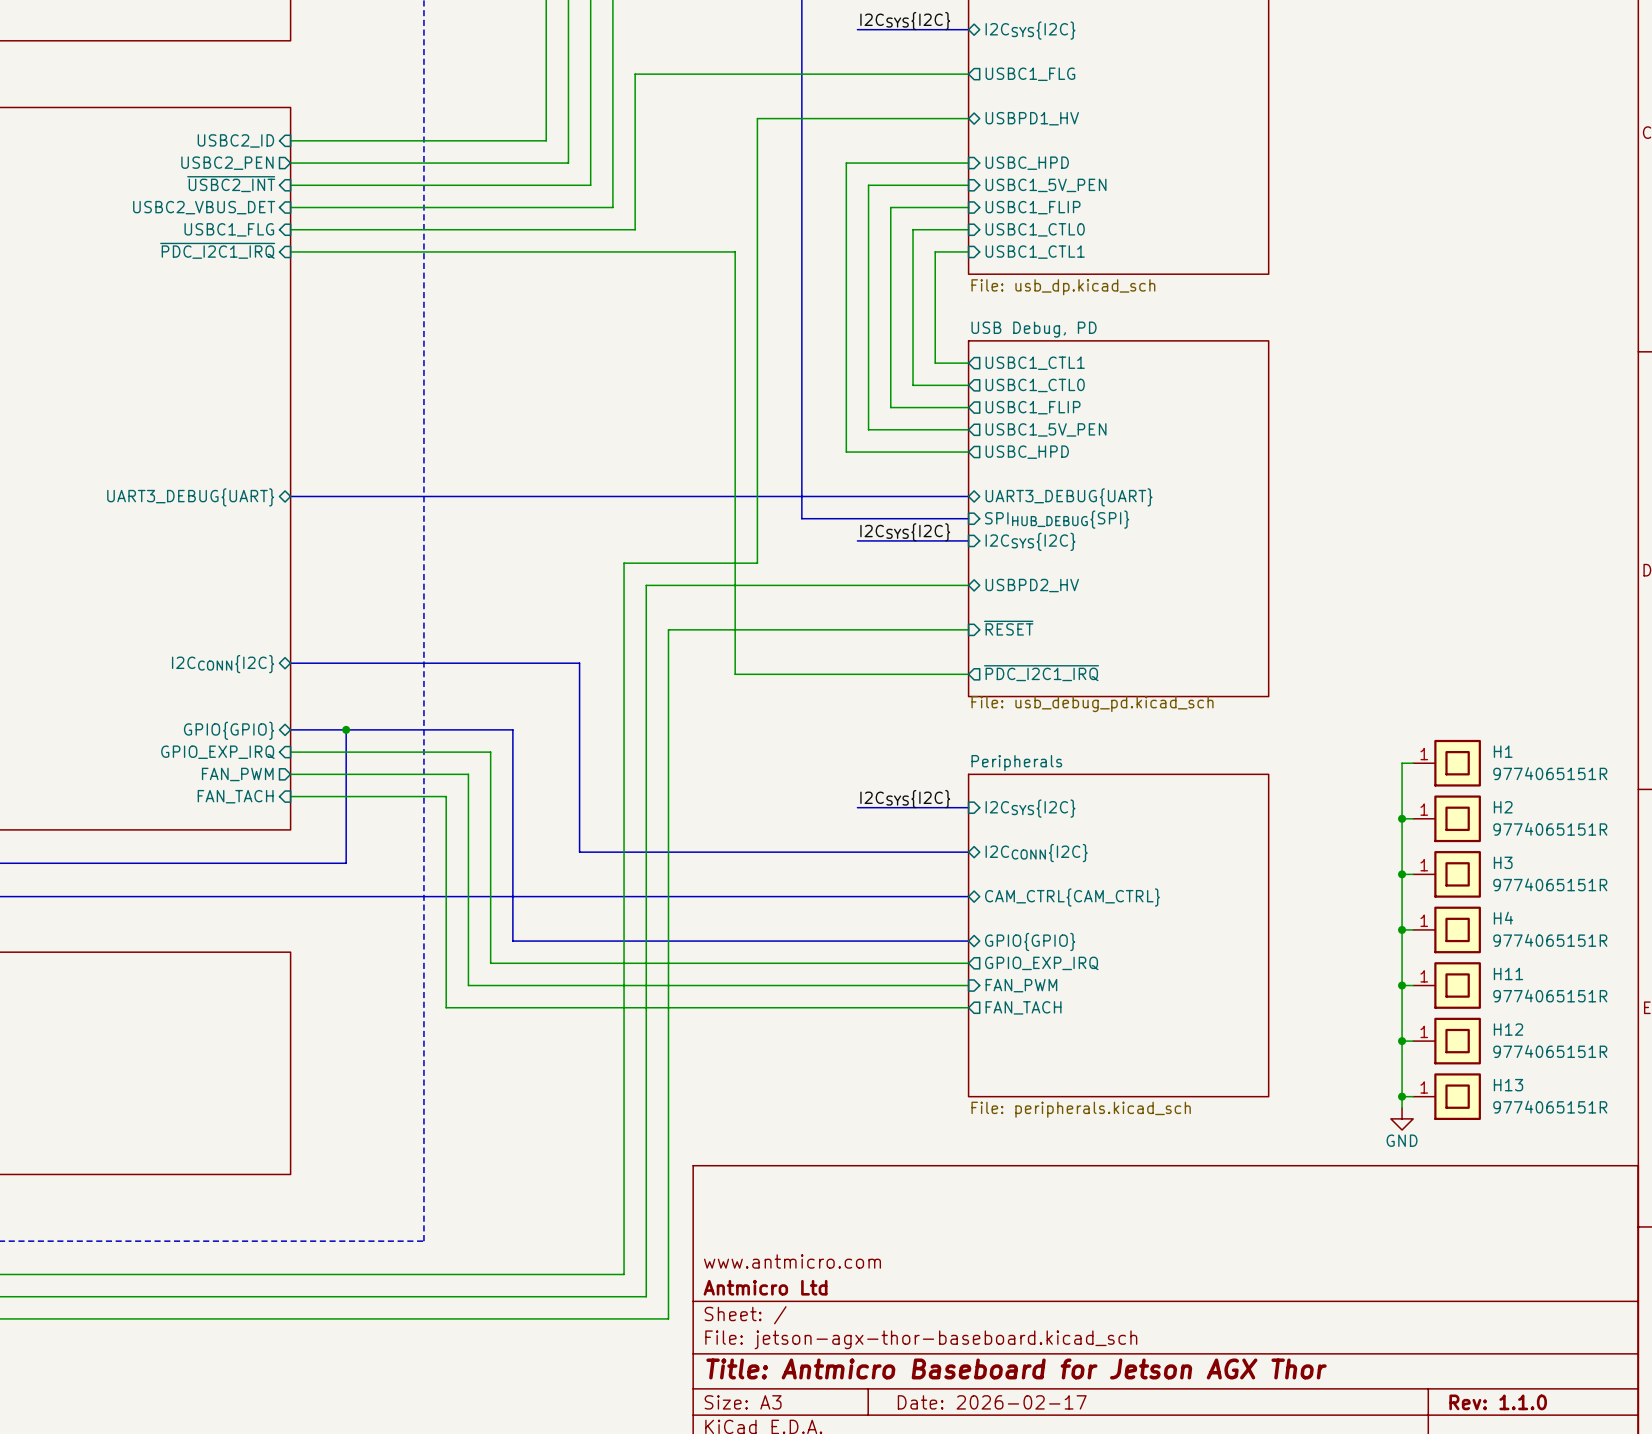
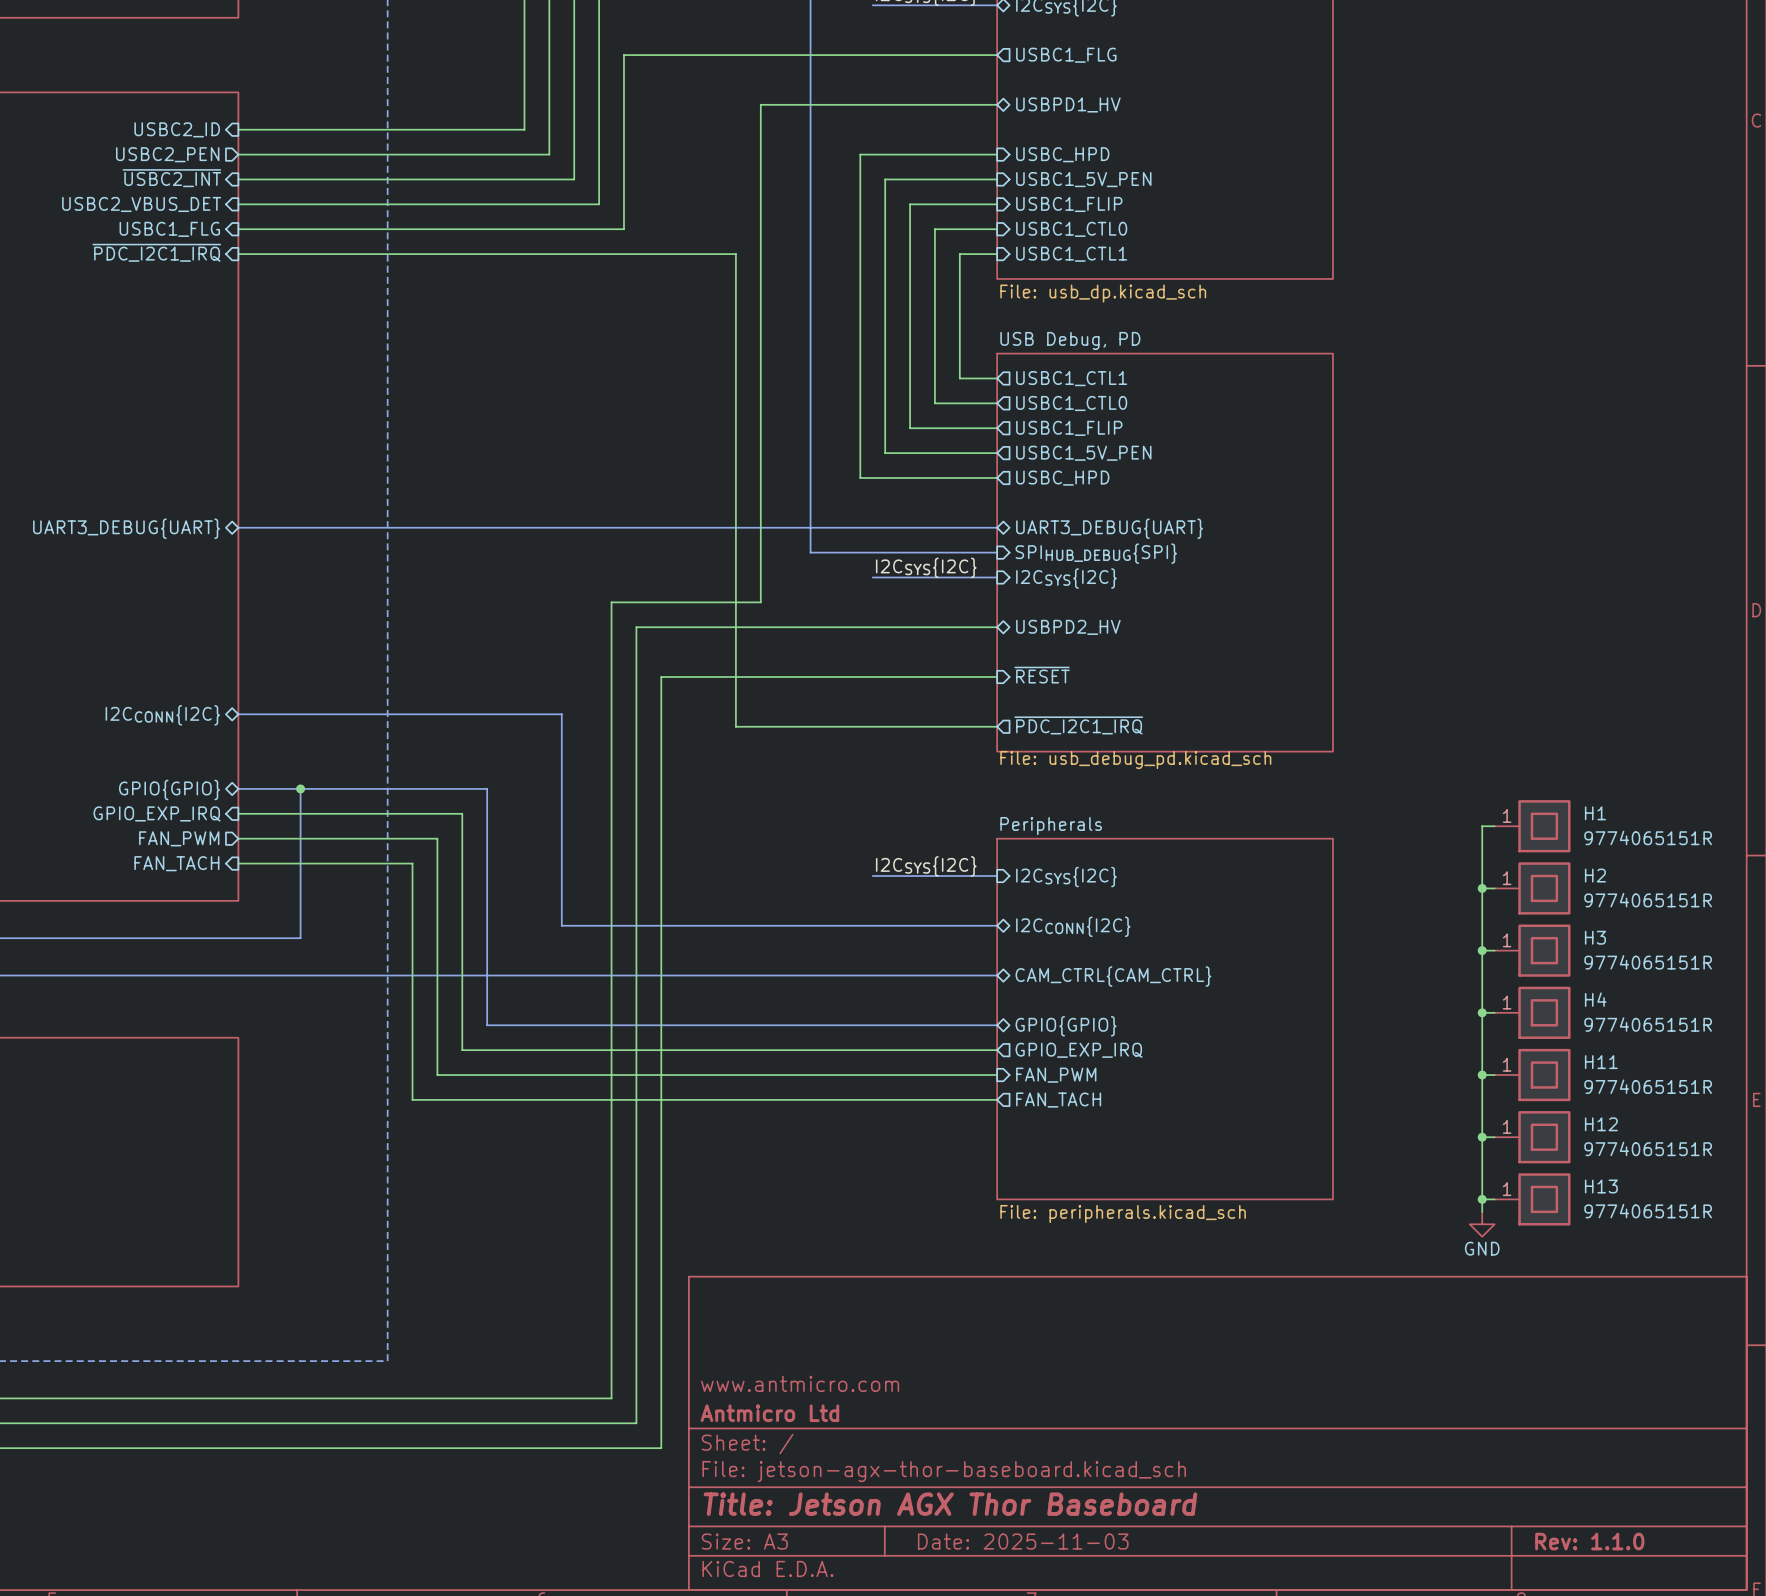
title block: Title: Antmicro Baseboard for Jetson AGX Thor (1016, 1368) -> Title: Jetson AGX Thor Baseboard (950, 1504)
title block: Date: 2026-02-17 (992, 1402) -> Date: 2025-11-03 (1023, 1541)

